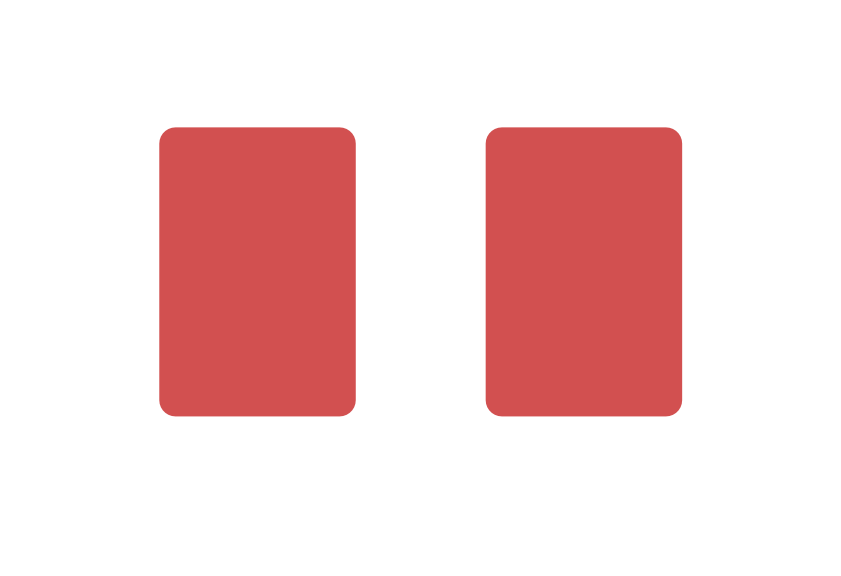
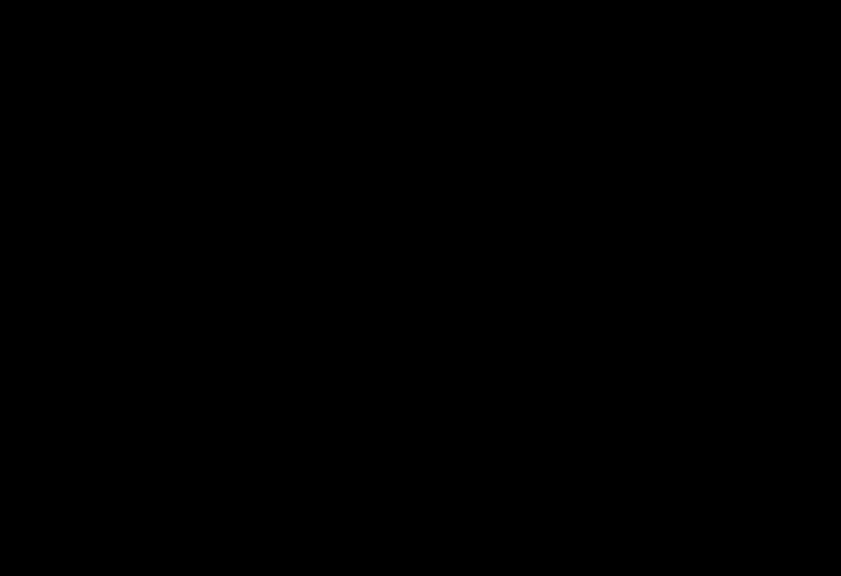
part: (420, 271) -> none

